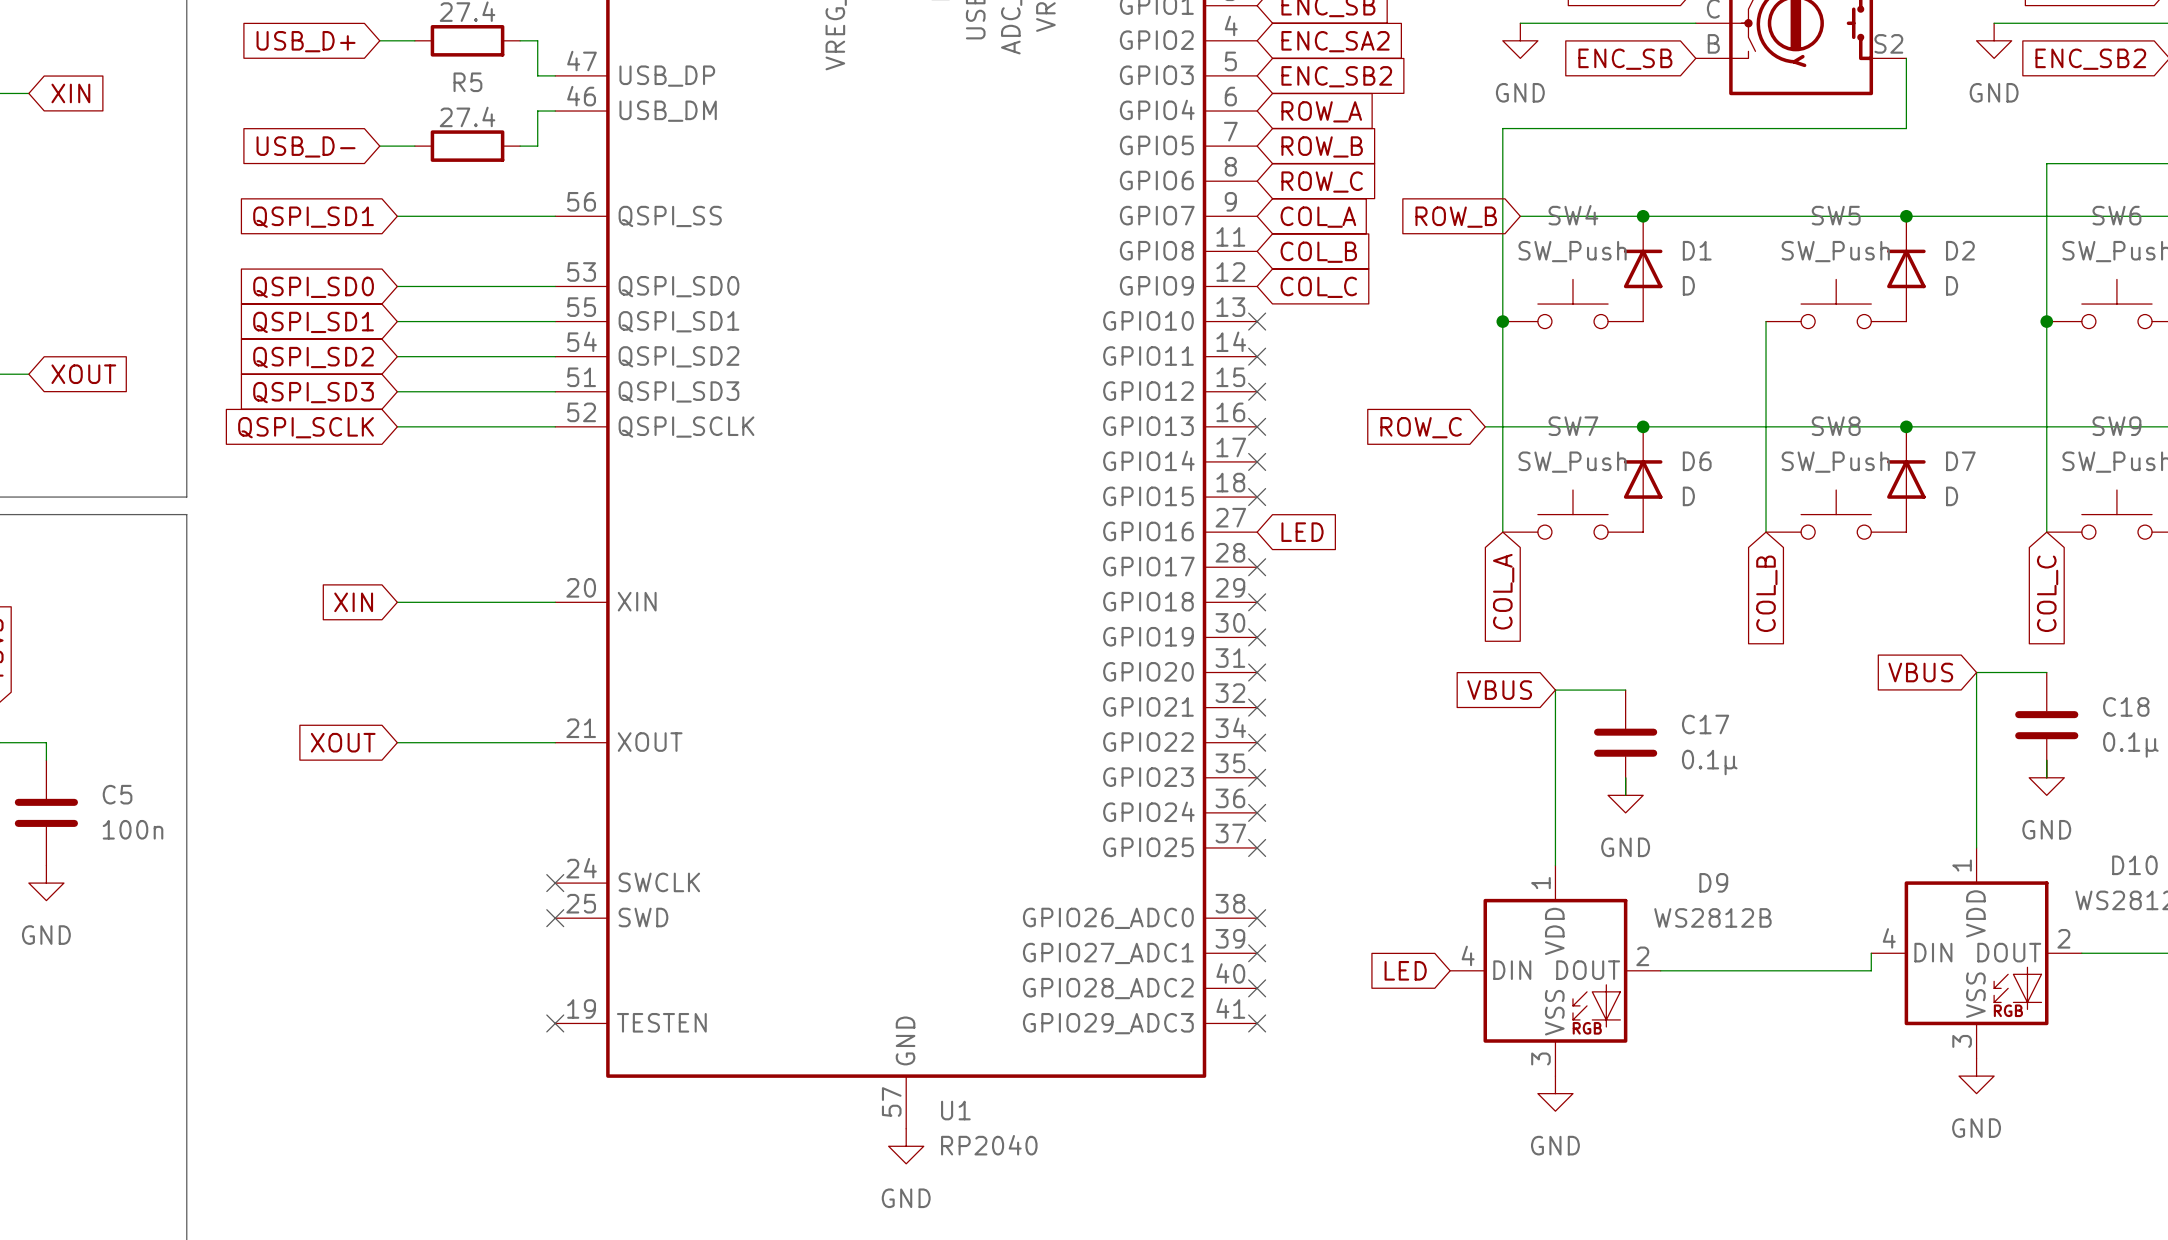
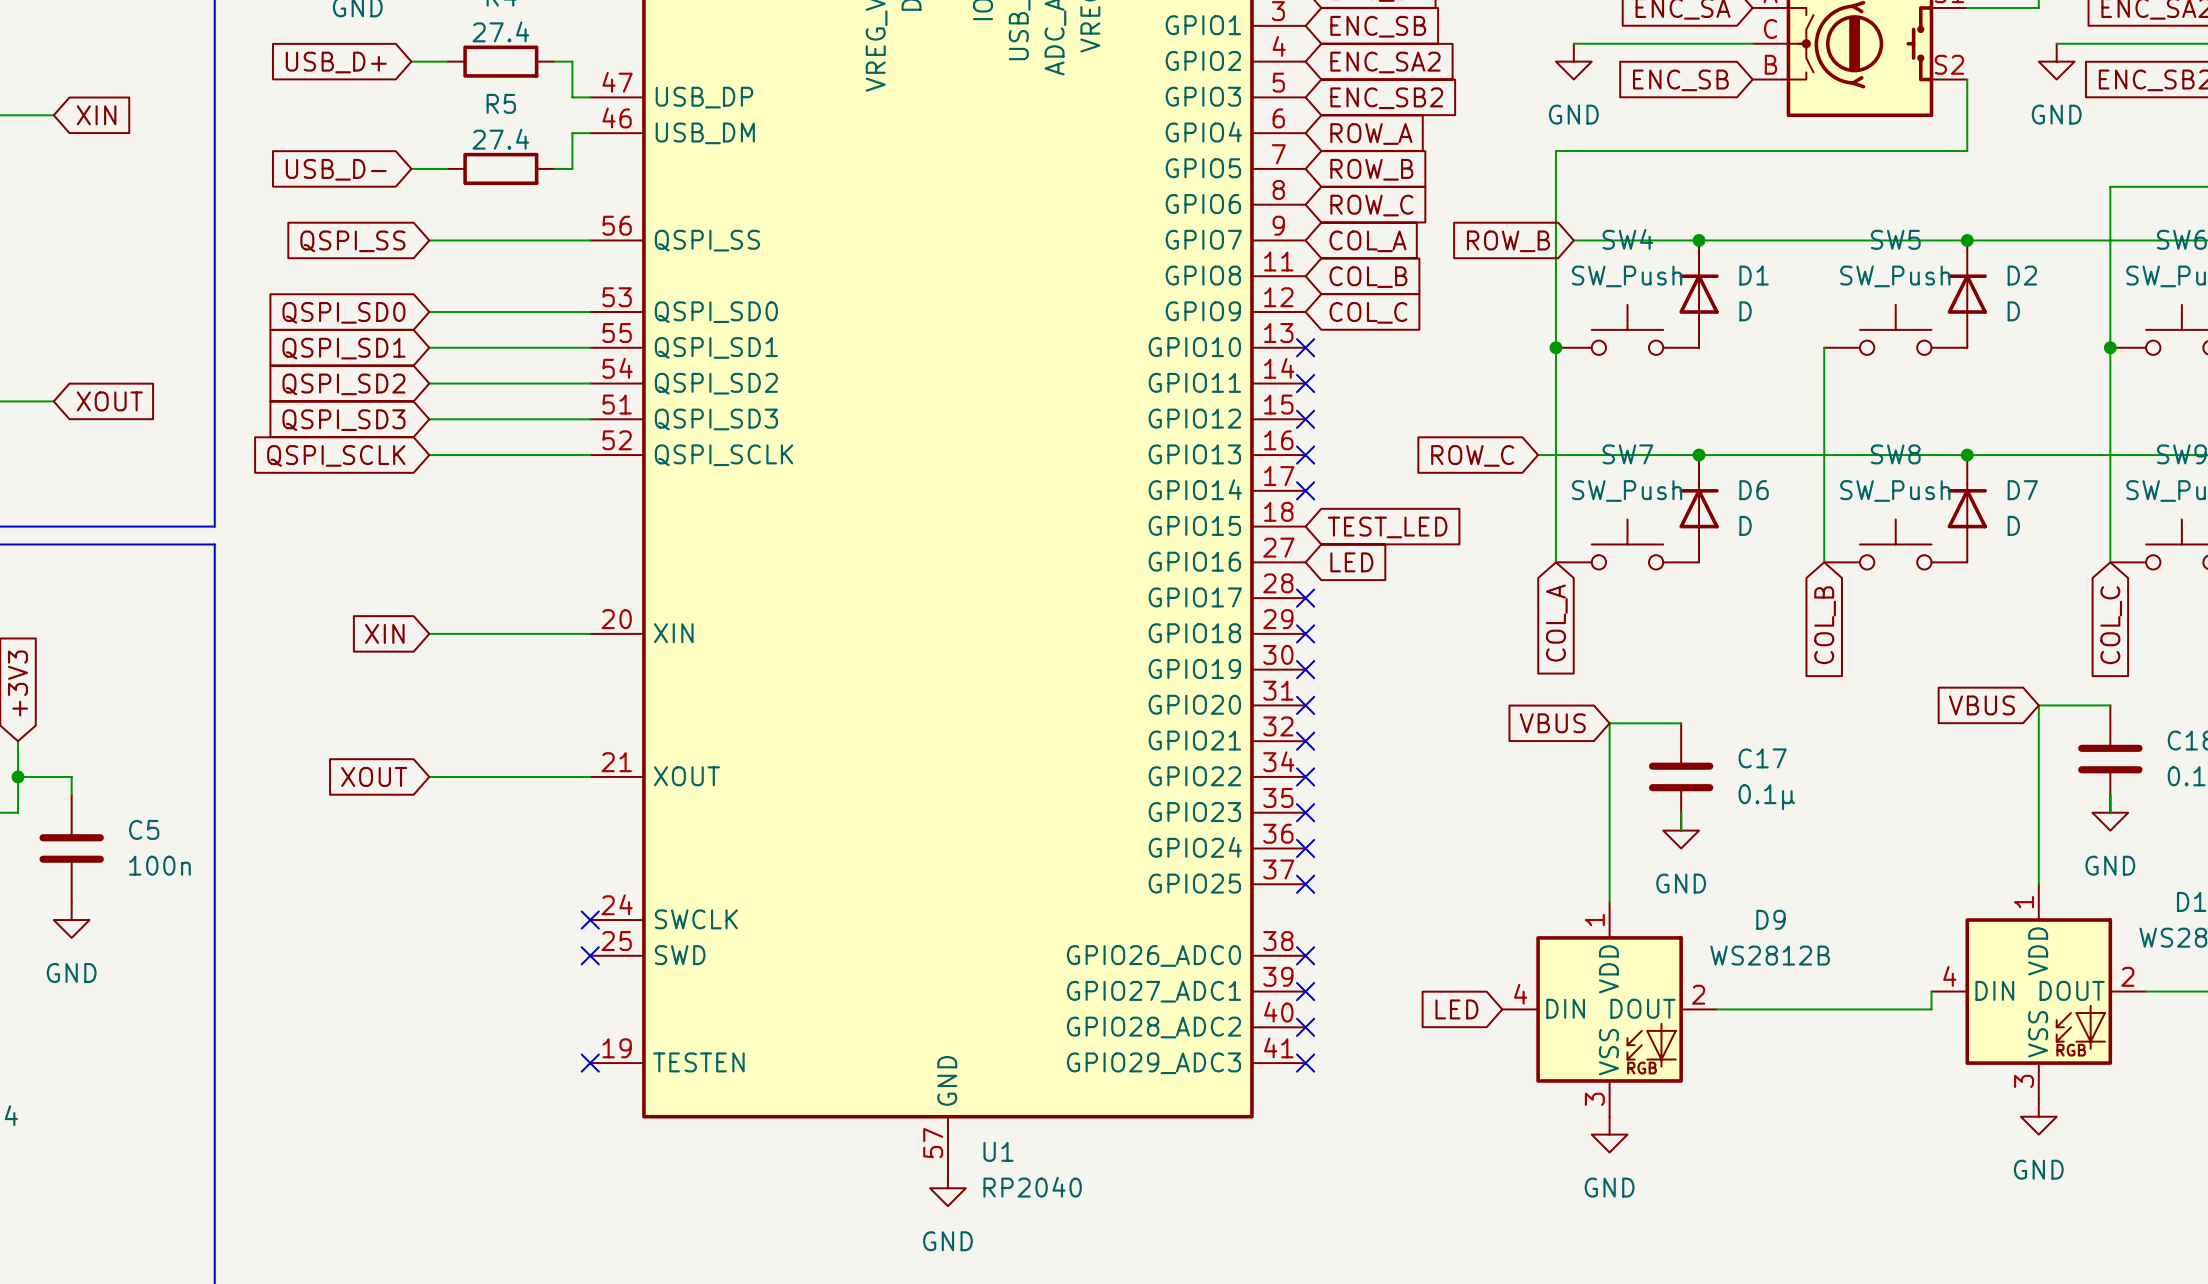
global label: QSPI_SD1 (313, 217) -> QSPI_SS (352, 241)
no-connect mark: (1257, 497) -> none
global label: none -> TEST_LED (1387, 527)

